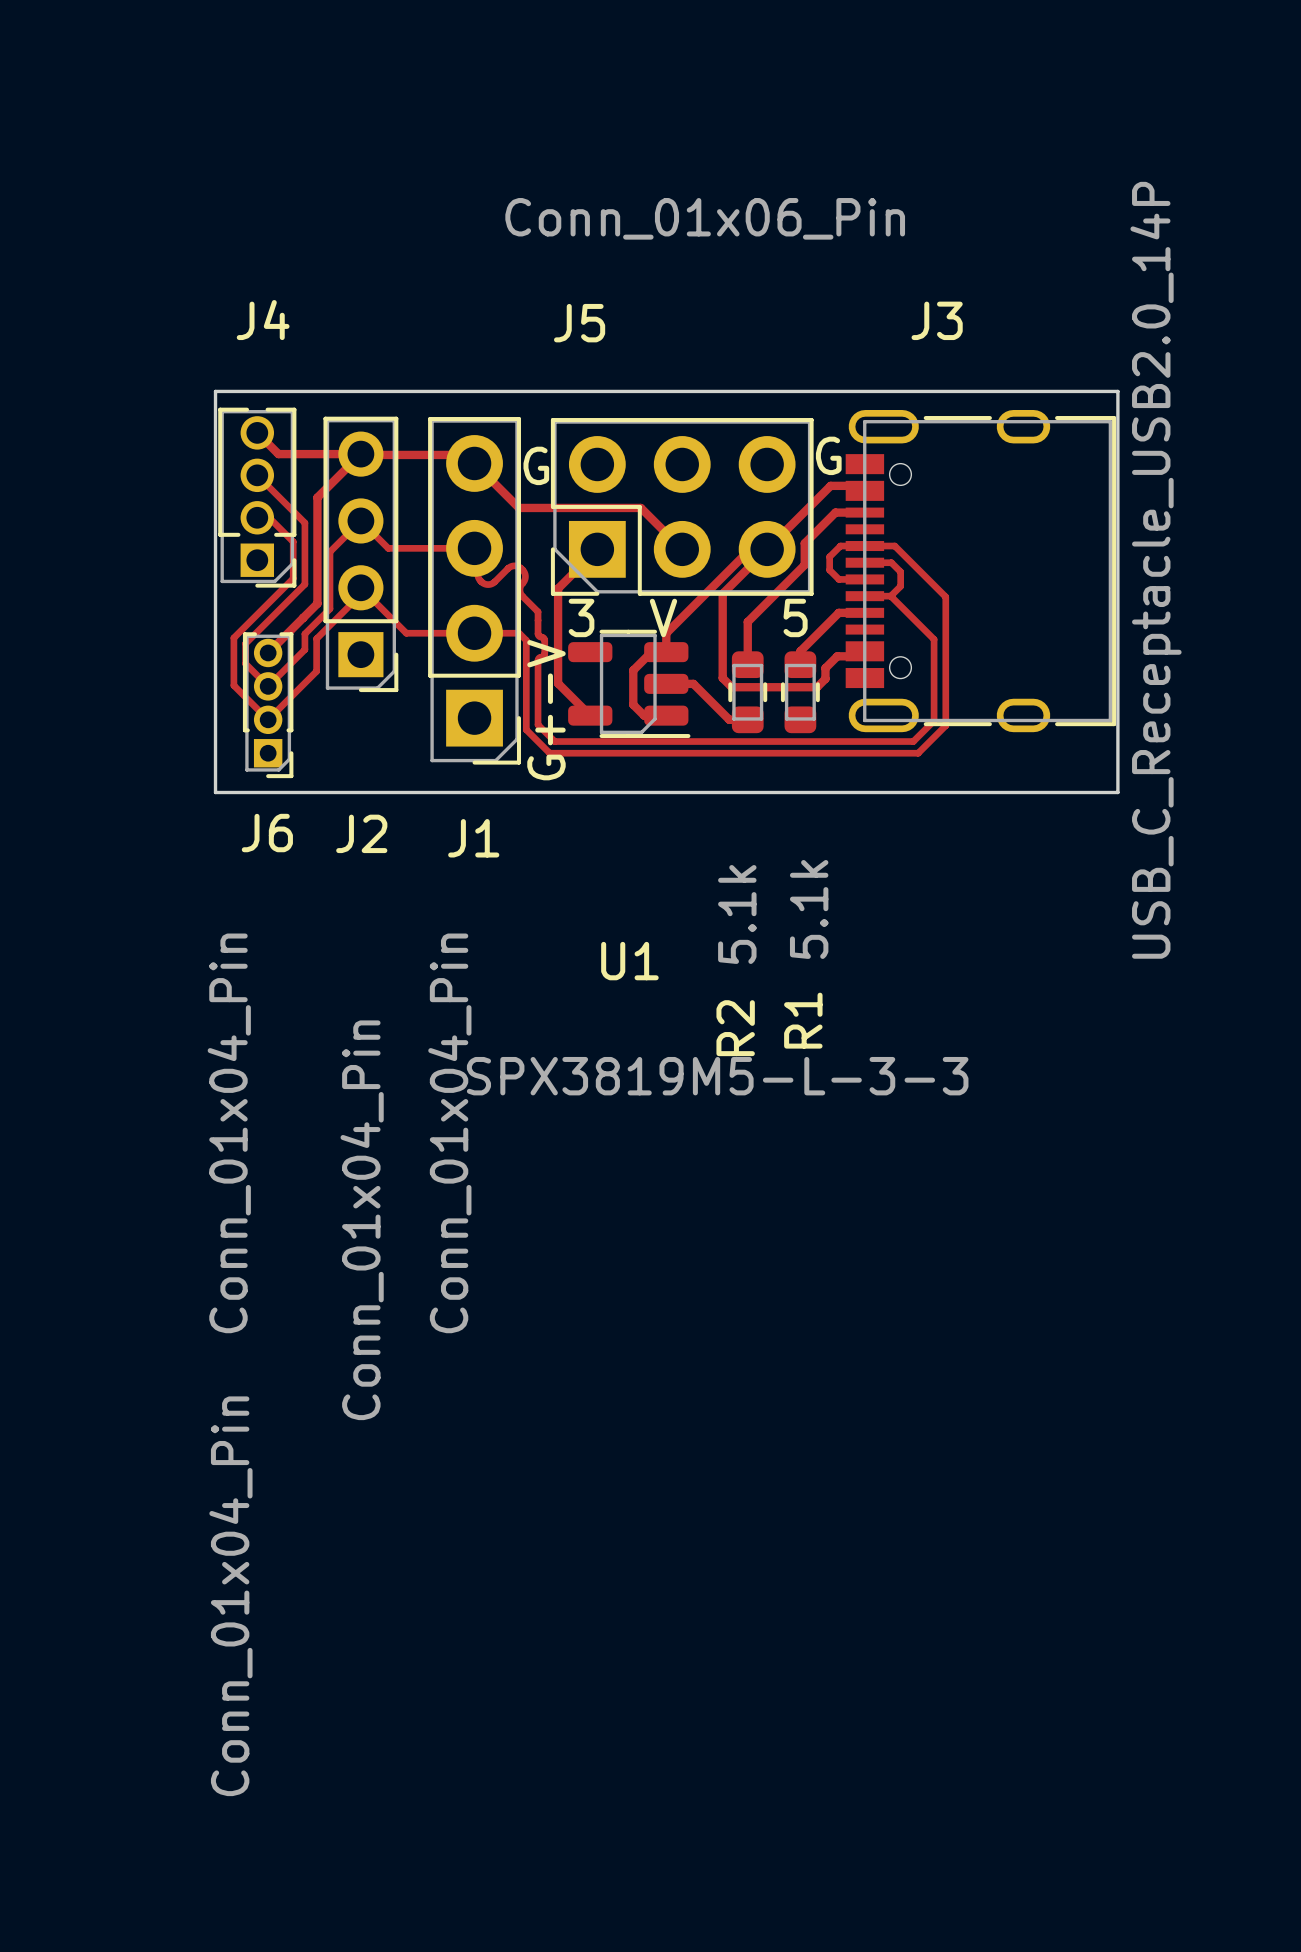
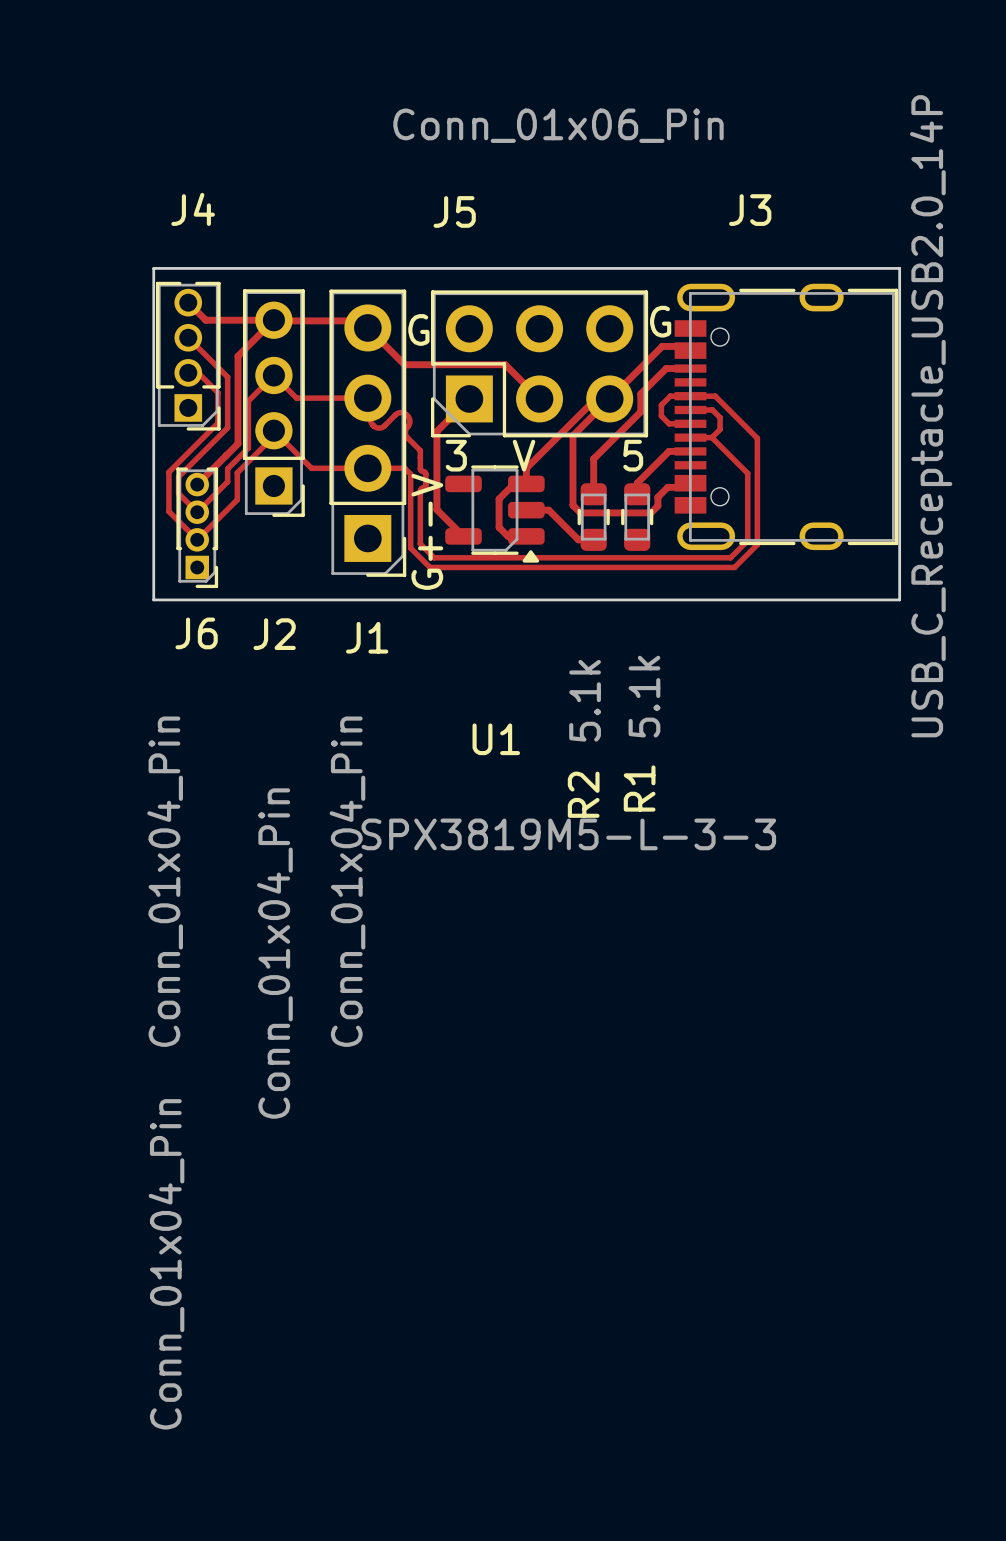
U1 footprint: [568, 629, 691, 739] -> [445, 465, 545, 563]

